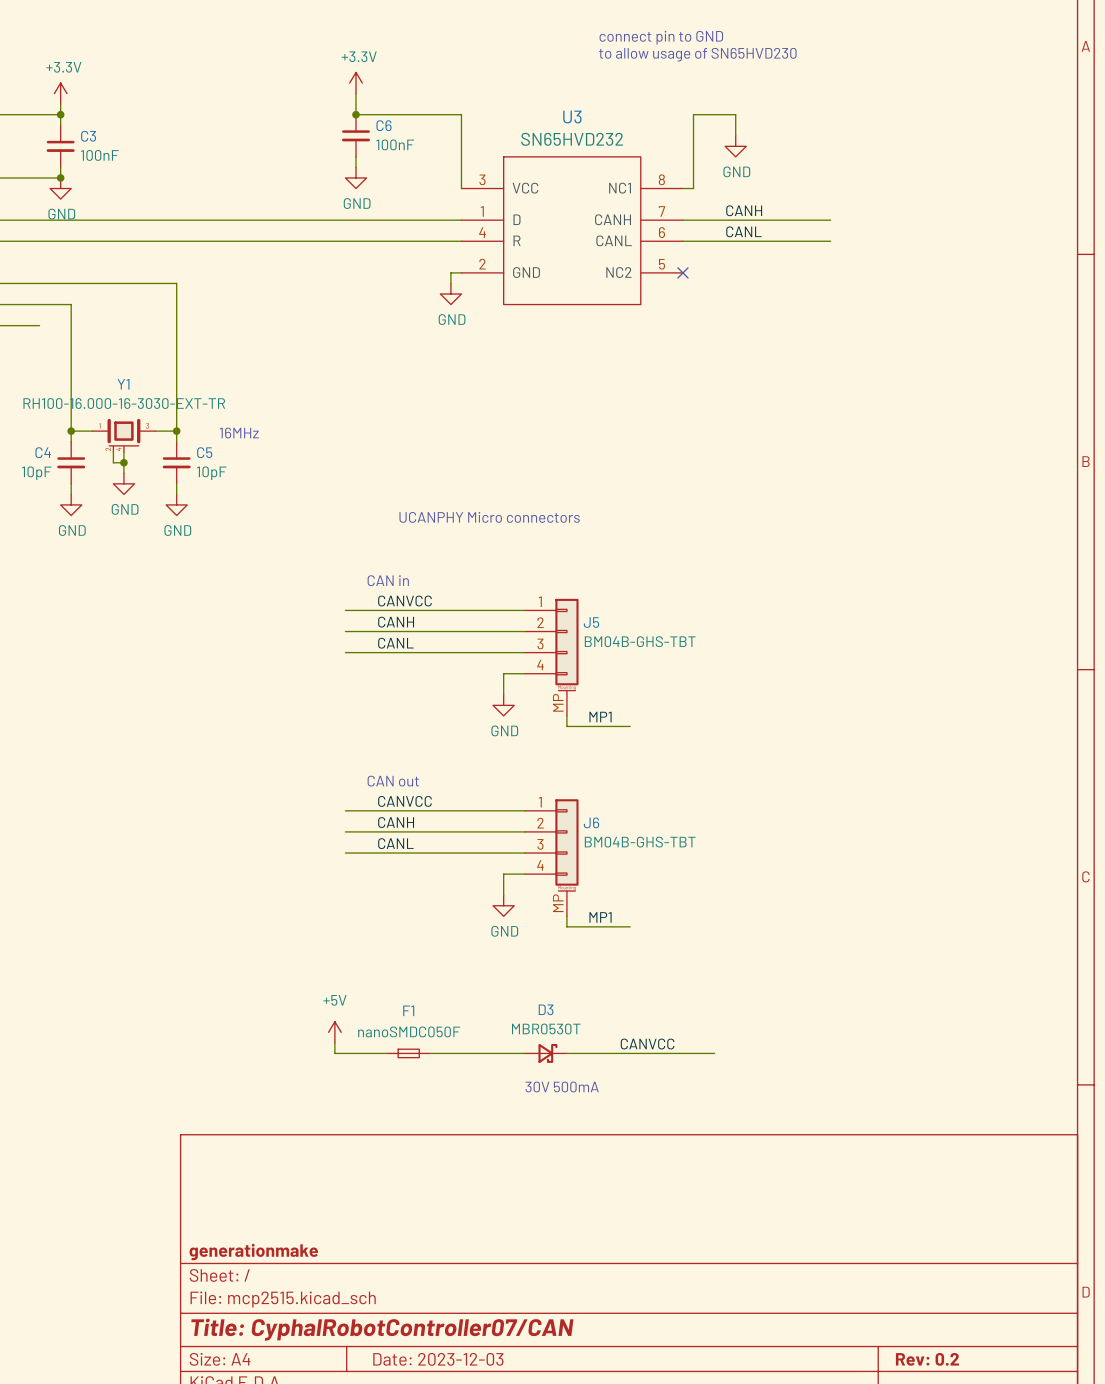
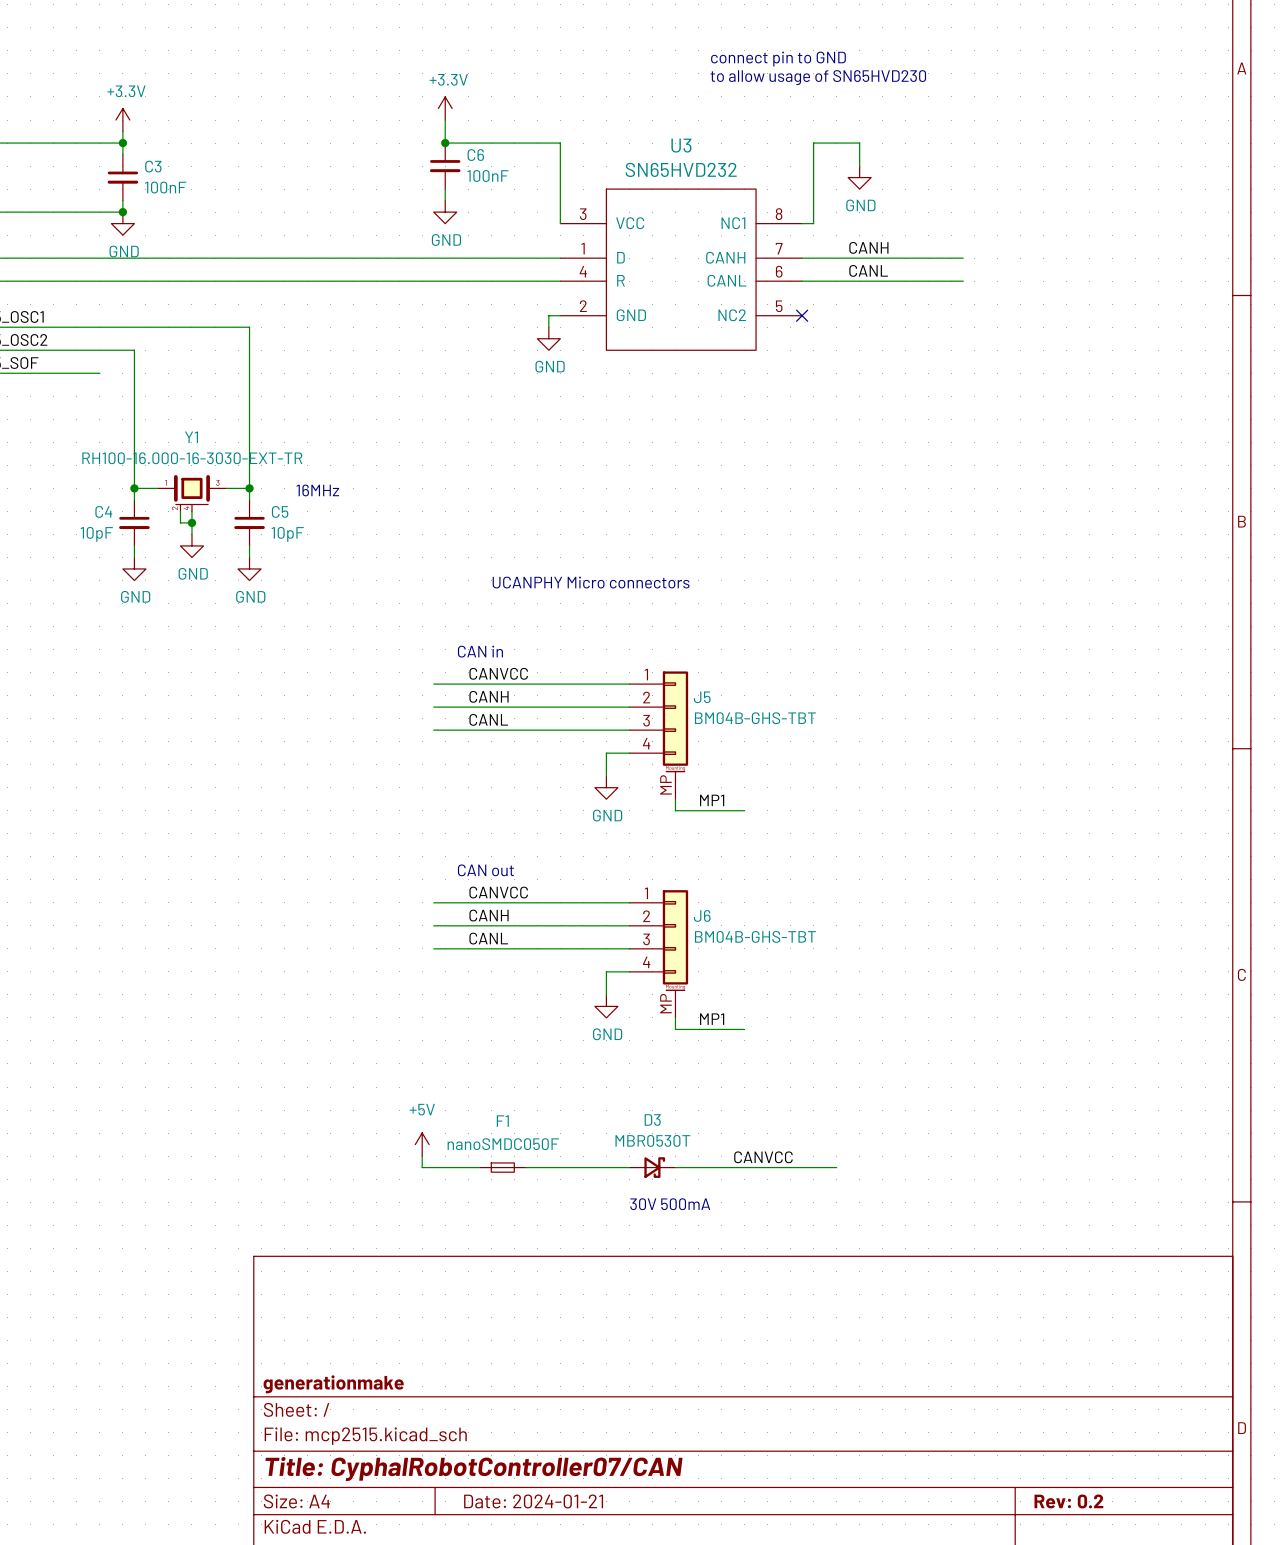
title block: Date: 2023-12-03 (438, 1359) -> Date: 2024-01-21 (533, 1501)

